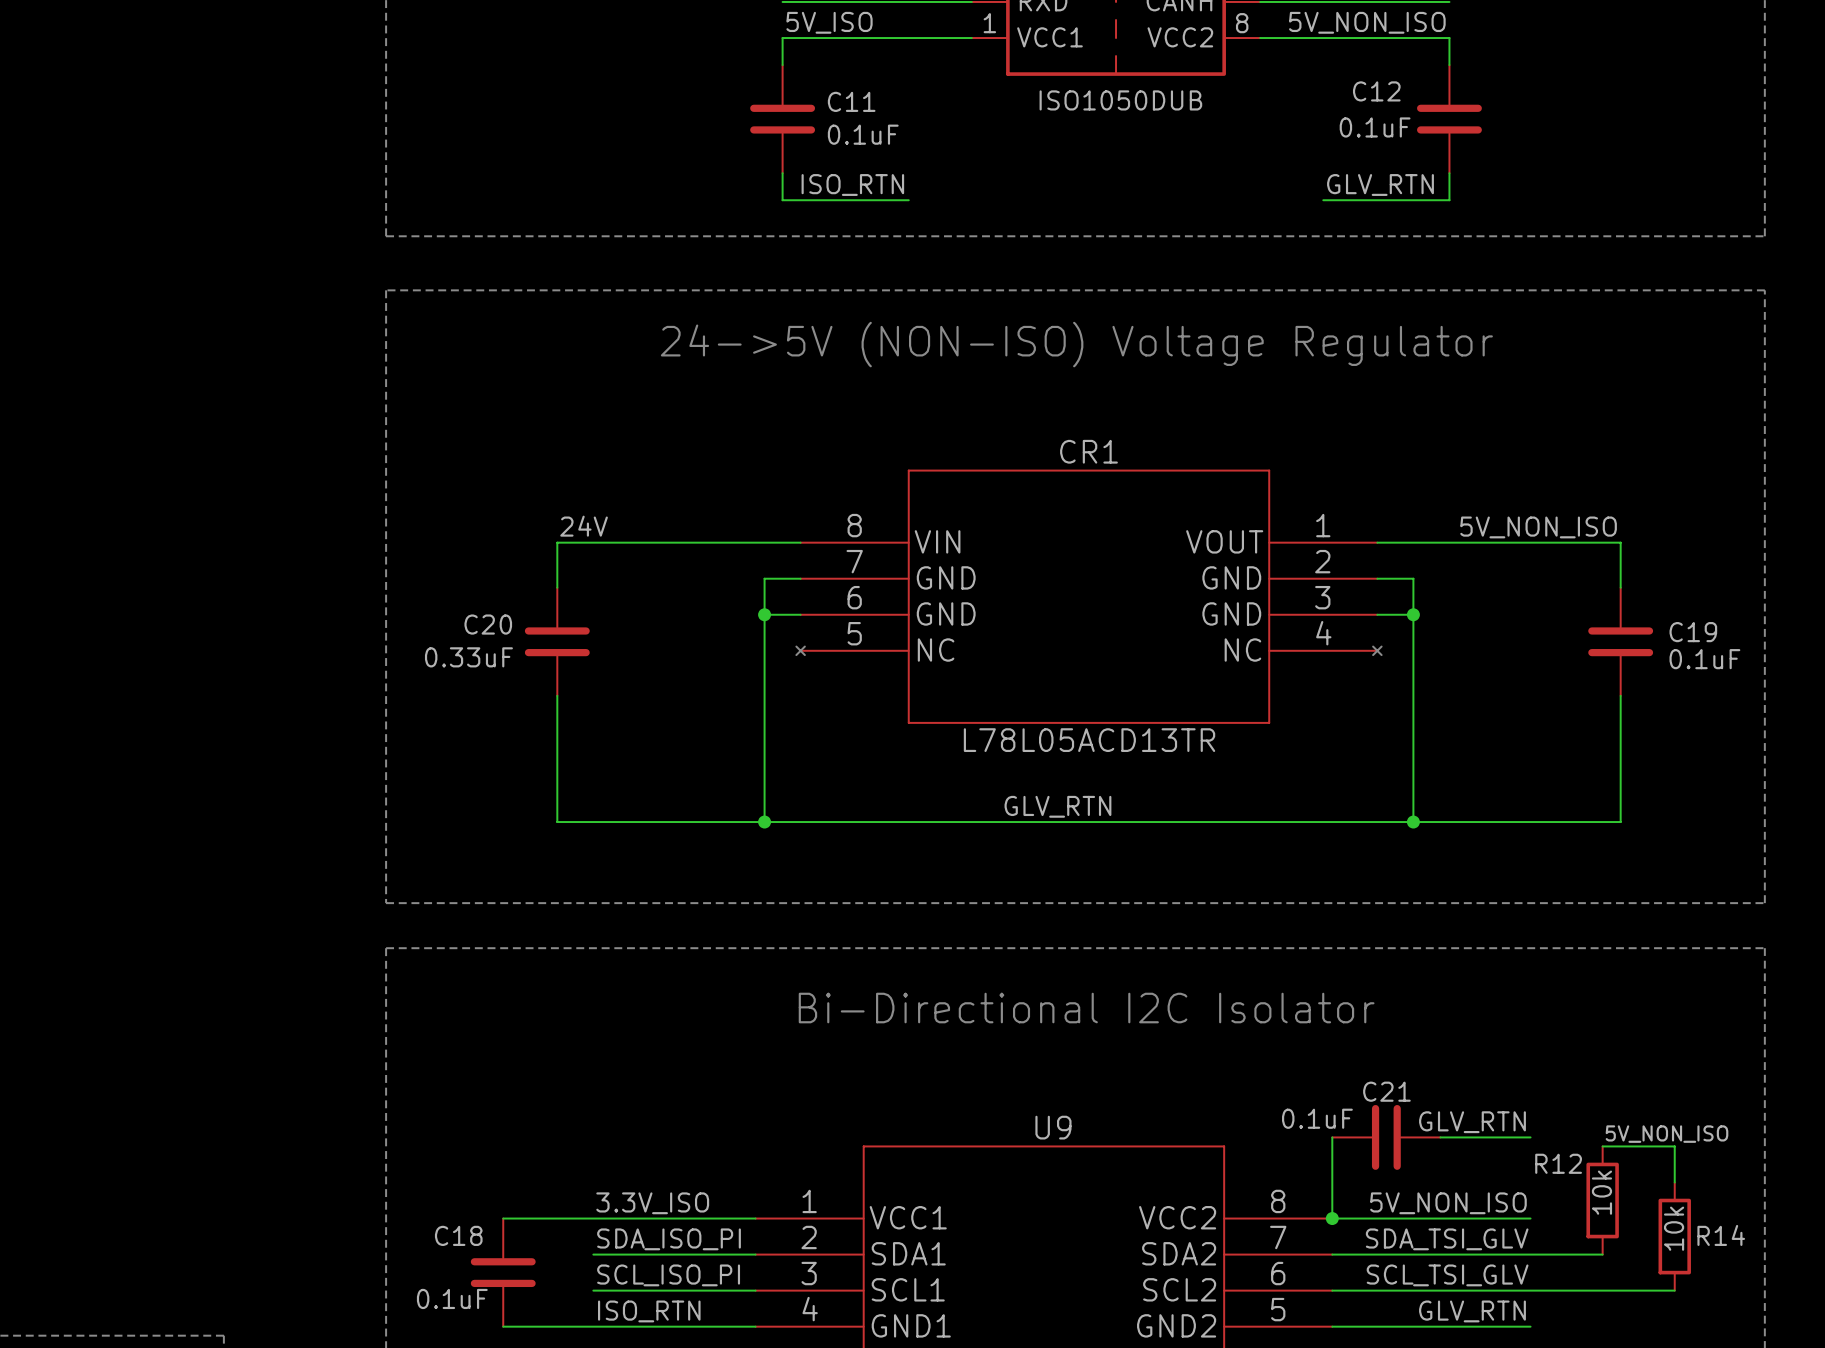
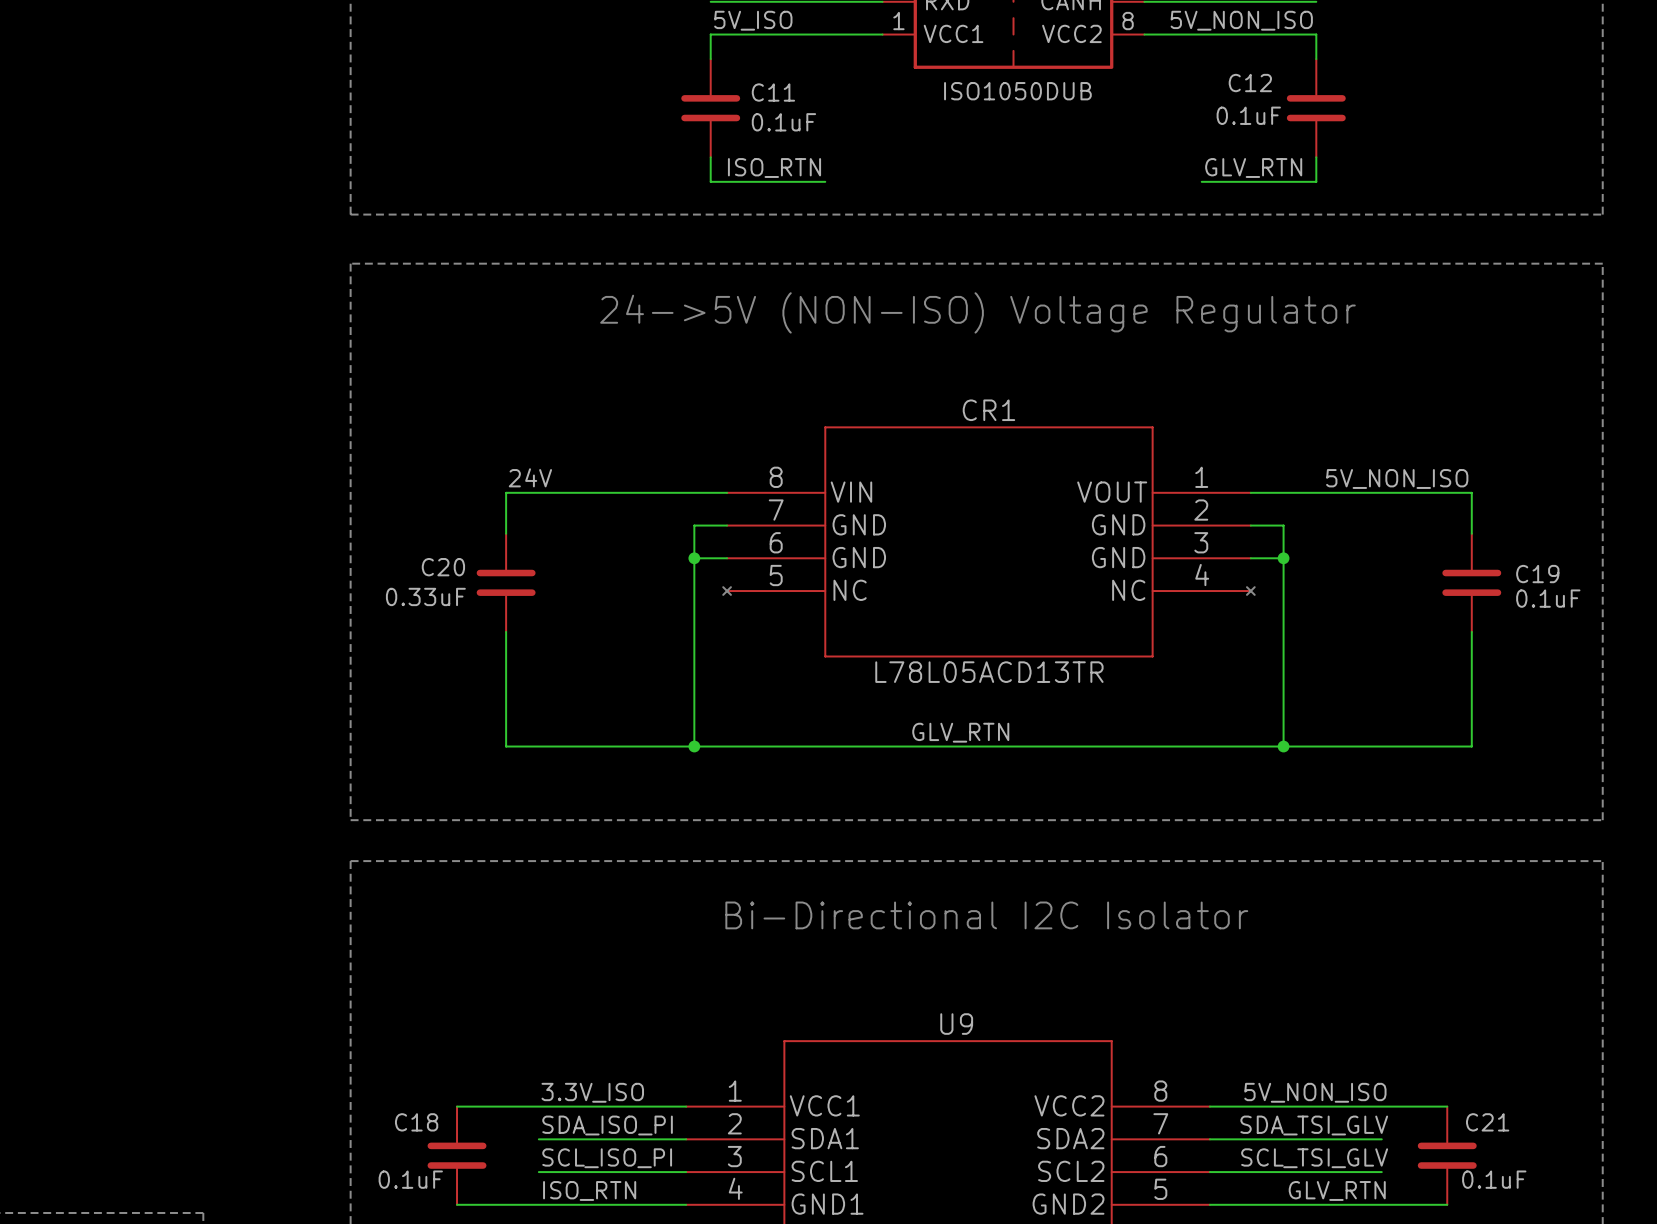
C21 name position: C21 (1386, 1091) -> C21 (1487, 1122)
C21 value position: 0.1uF (1317, 1118) -> 0.1uF (1494, 1179)
label: GLV_RTN (1472, 1122) -> none
label: 5V_NON_ISO (1666, 1134) -> none
wire: (1332, 1137) (1332, 1218) -> none
C21 rotation: 0° (1386, 1137) -> 90° clockwise (1447, 1155)
C21 position: (1386, 1137) -> (1447, 1155)
wire: (1440, 1137) (1530, 1137) -> none
wire: (1602, 1146) (1674, 1146) (1674, 1182) -> none
R12: 10k (1602, 1200) -> none
junction: (1332, 1218) -> none
wire: none -> (1389, 1106) (1447, 1106)
R14: 10k (1674, 1236) -> none
wire: (1521, 1254) (1602, 1254) -> none
wire: (1521, 1290) (1674, 1290) -> none
wire: none -> (1389, 1204) (1447, 1204)

